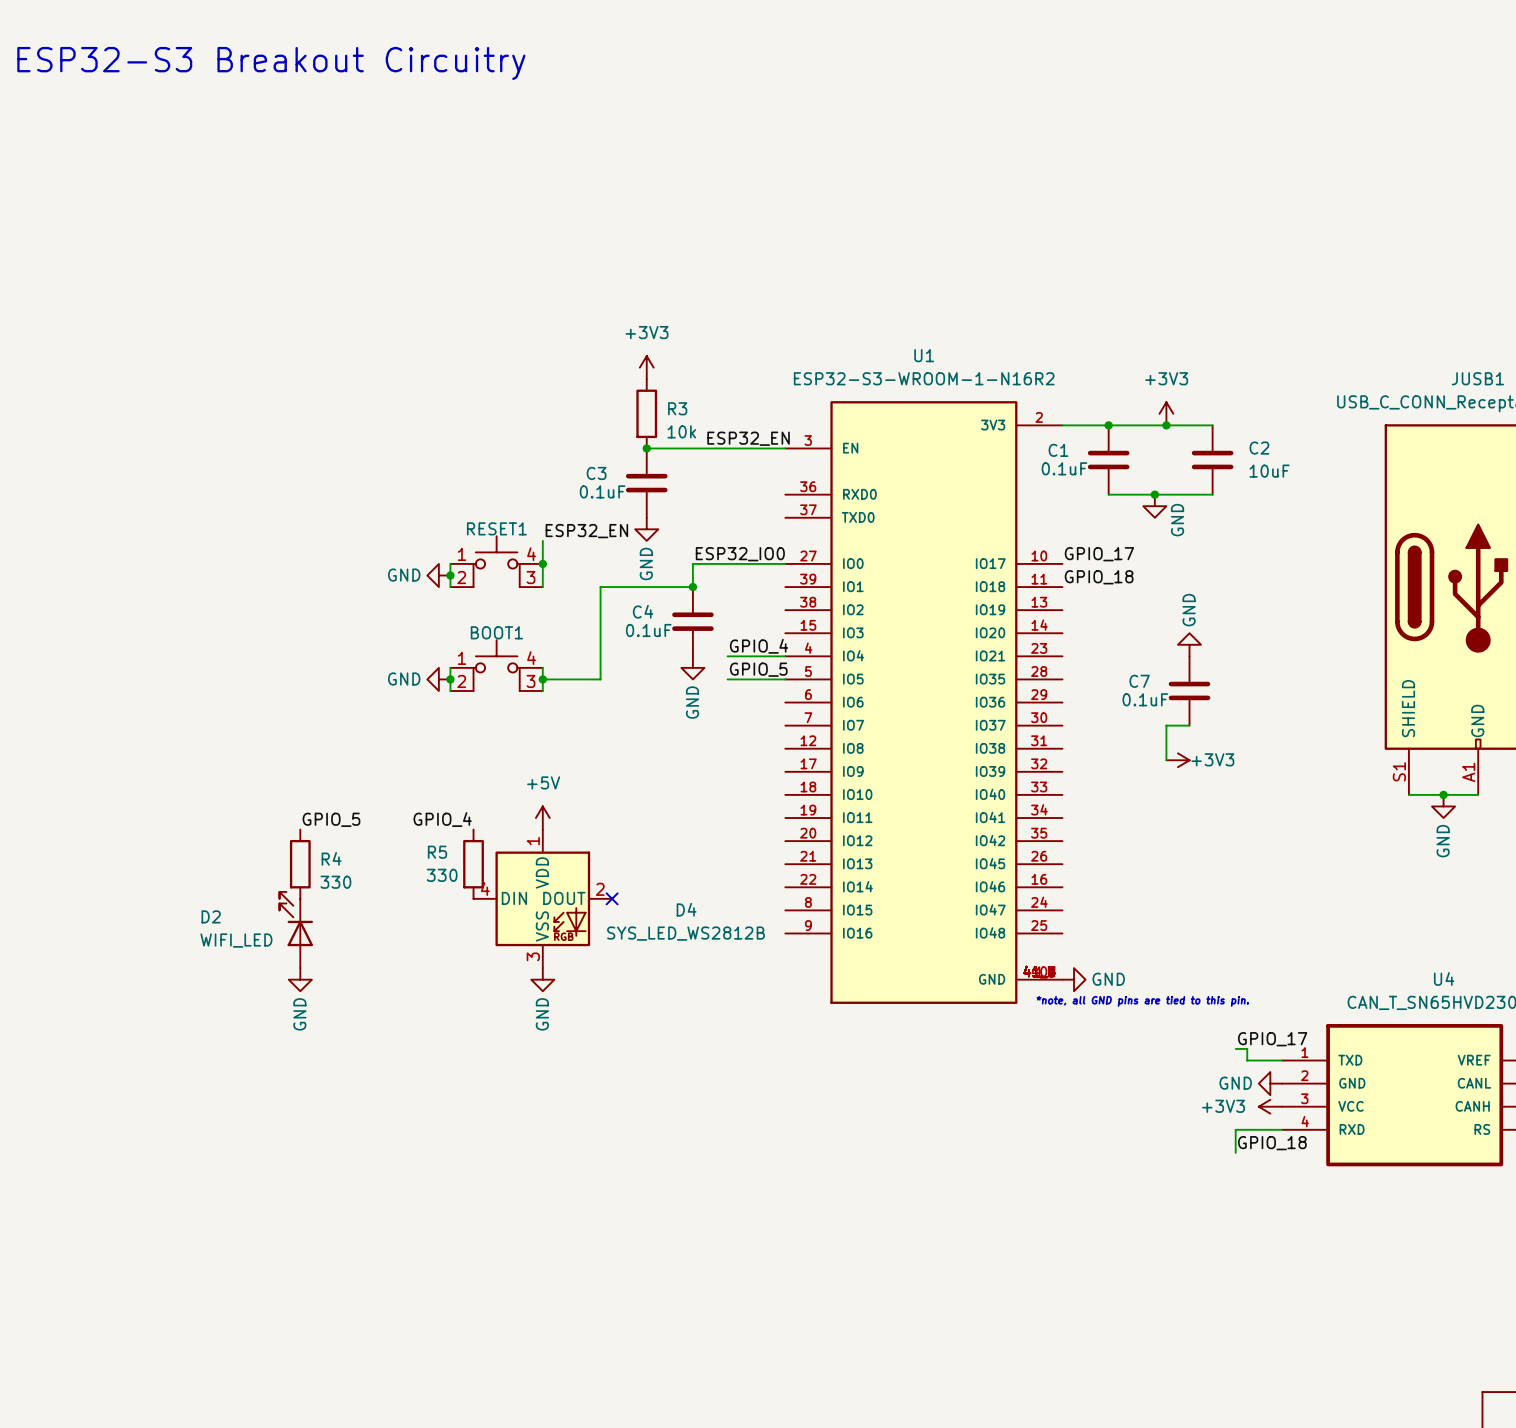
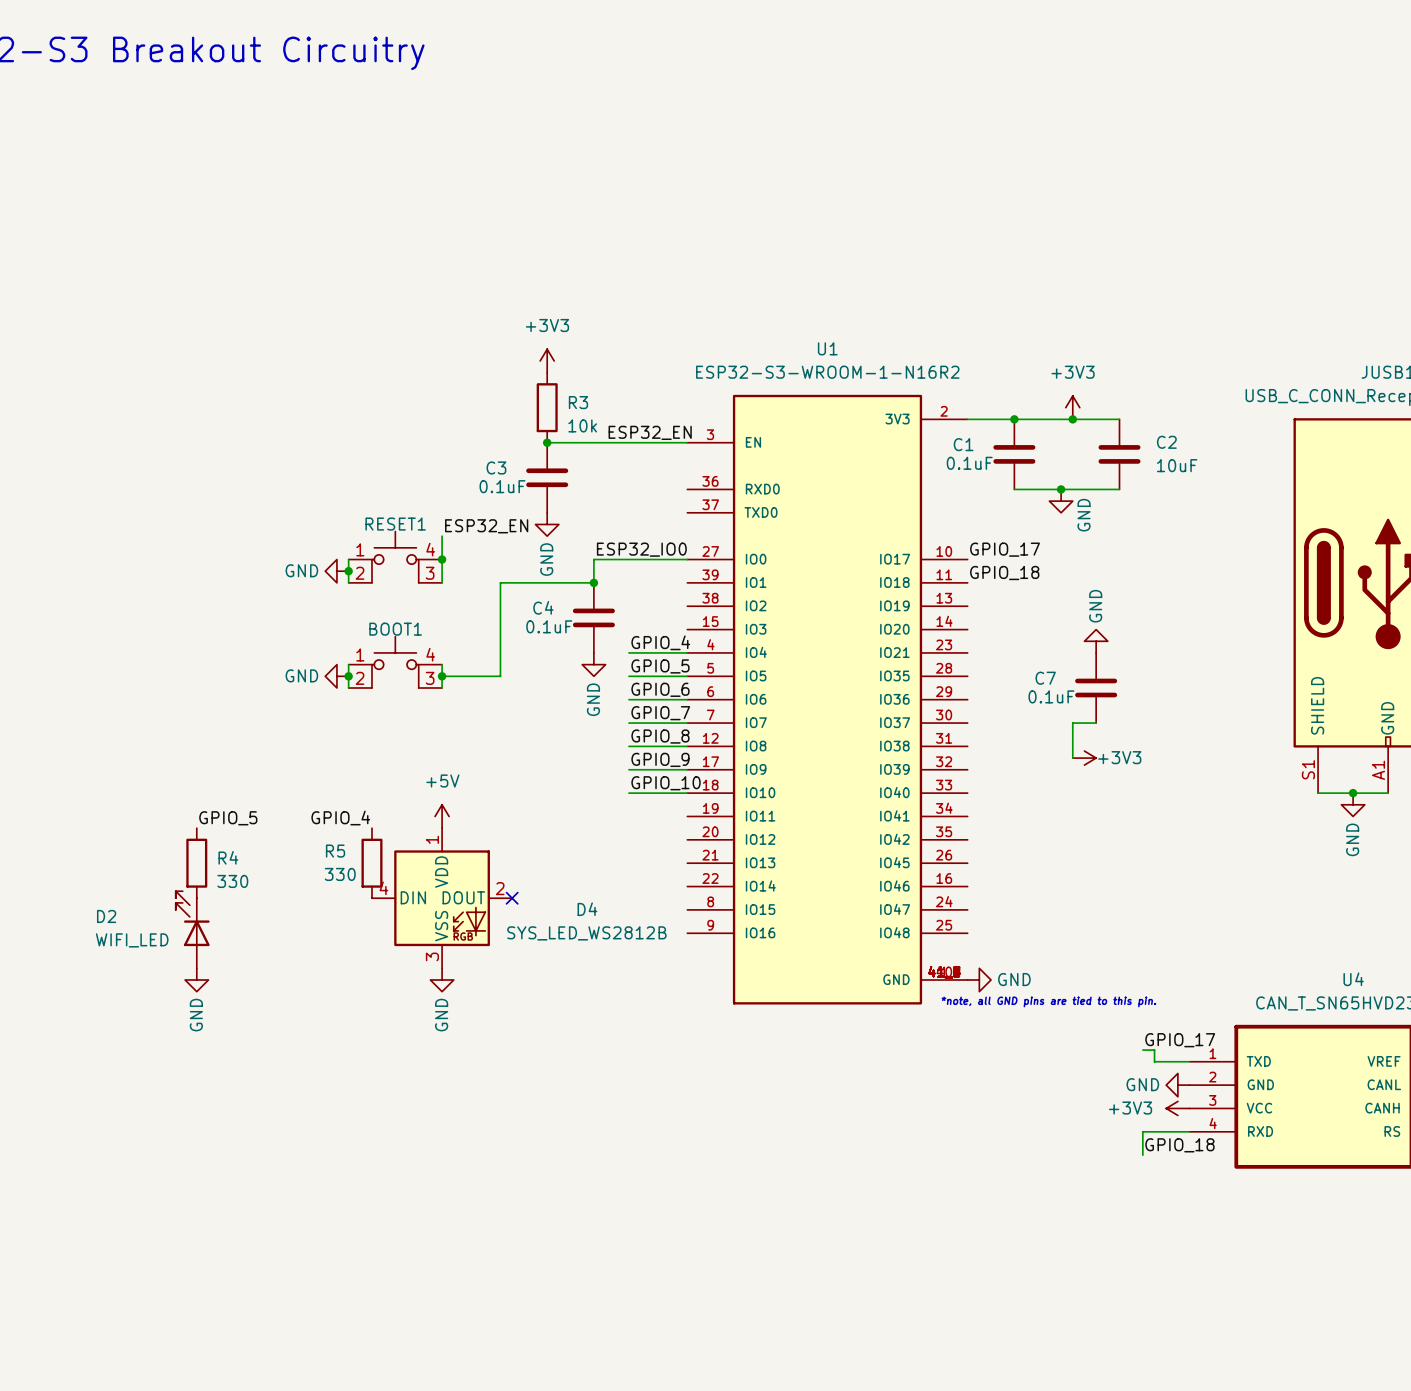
label: none -> GPIO_6 (660, 689)
wire: none -> (628, 699) (687, 699)
label: none -> GPIO_7 (660, 713)
wire: none -> (628, 723) (687, 723)
label: none -> GPIO_8 (660, 736)
wire: none -> (628, 746) (687, 746)
label: none -> GPIO_9 (660, 759)
wire: none -> (628, 769) (687, 769)
label: none -> GPIO_10 (666, 783)
wire: none -> (628, 793) (687, 793)

